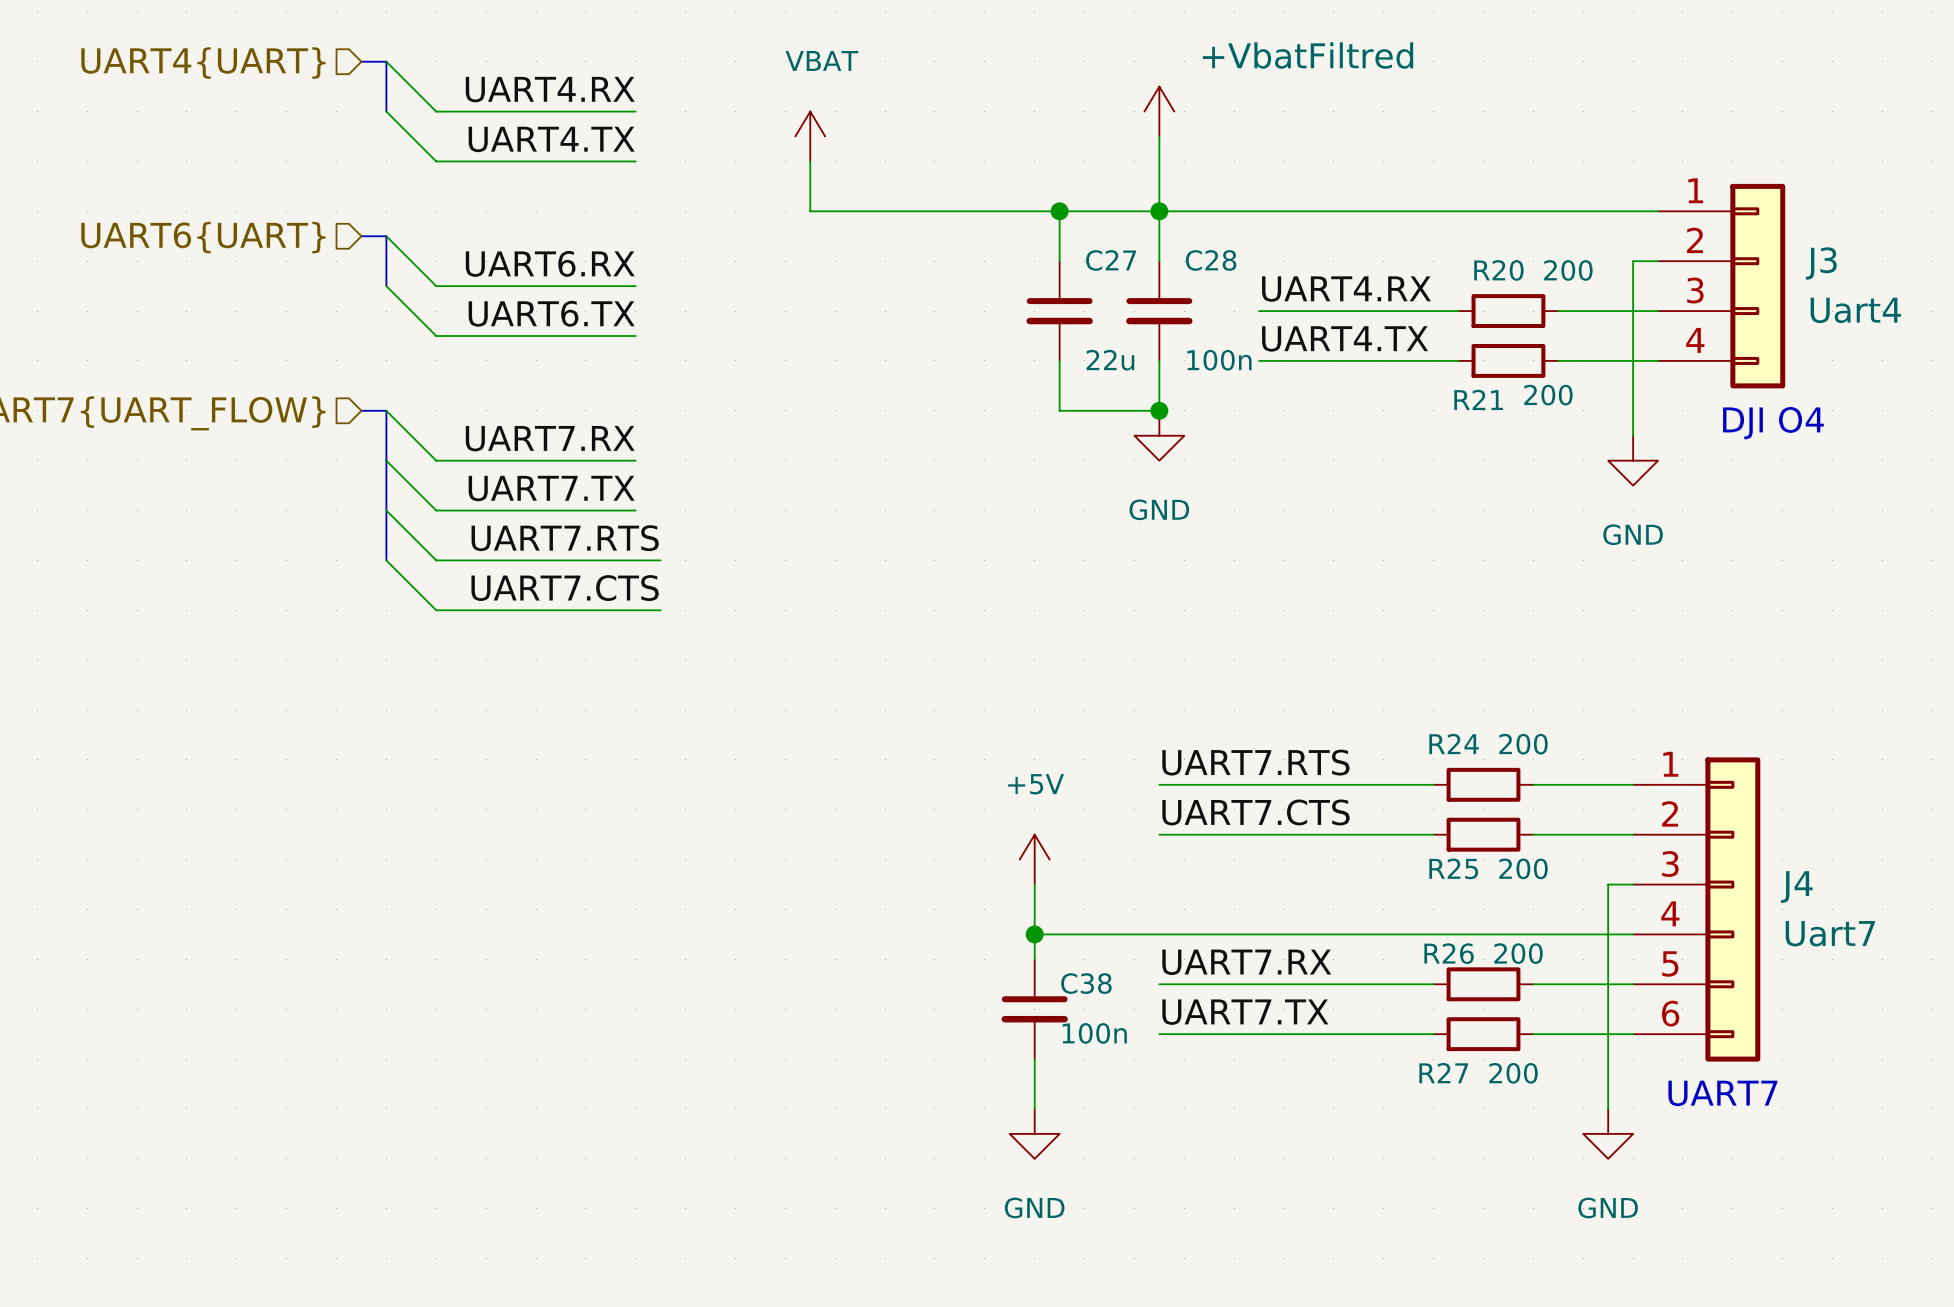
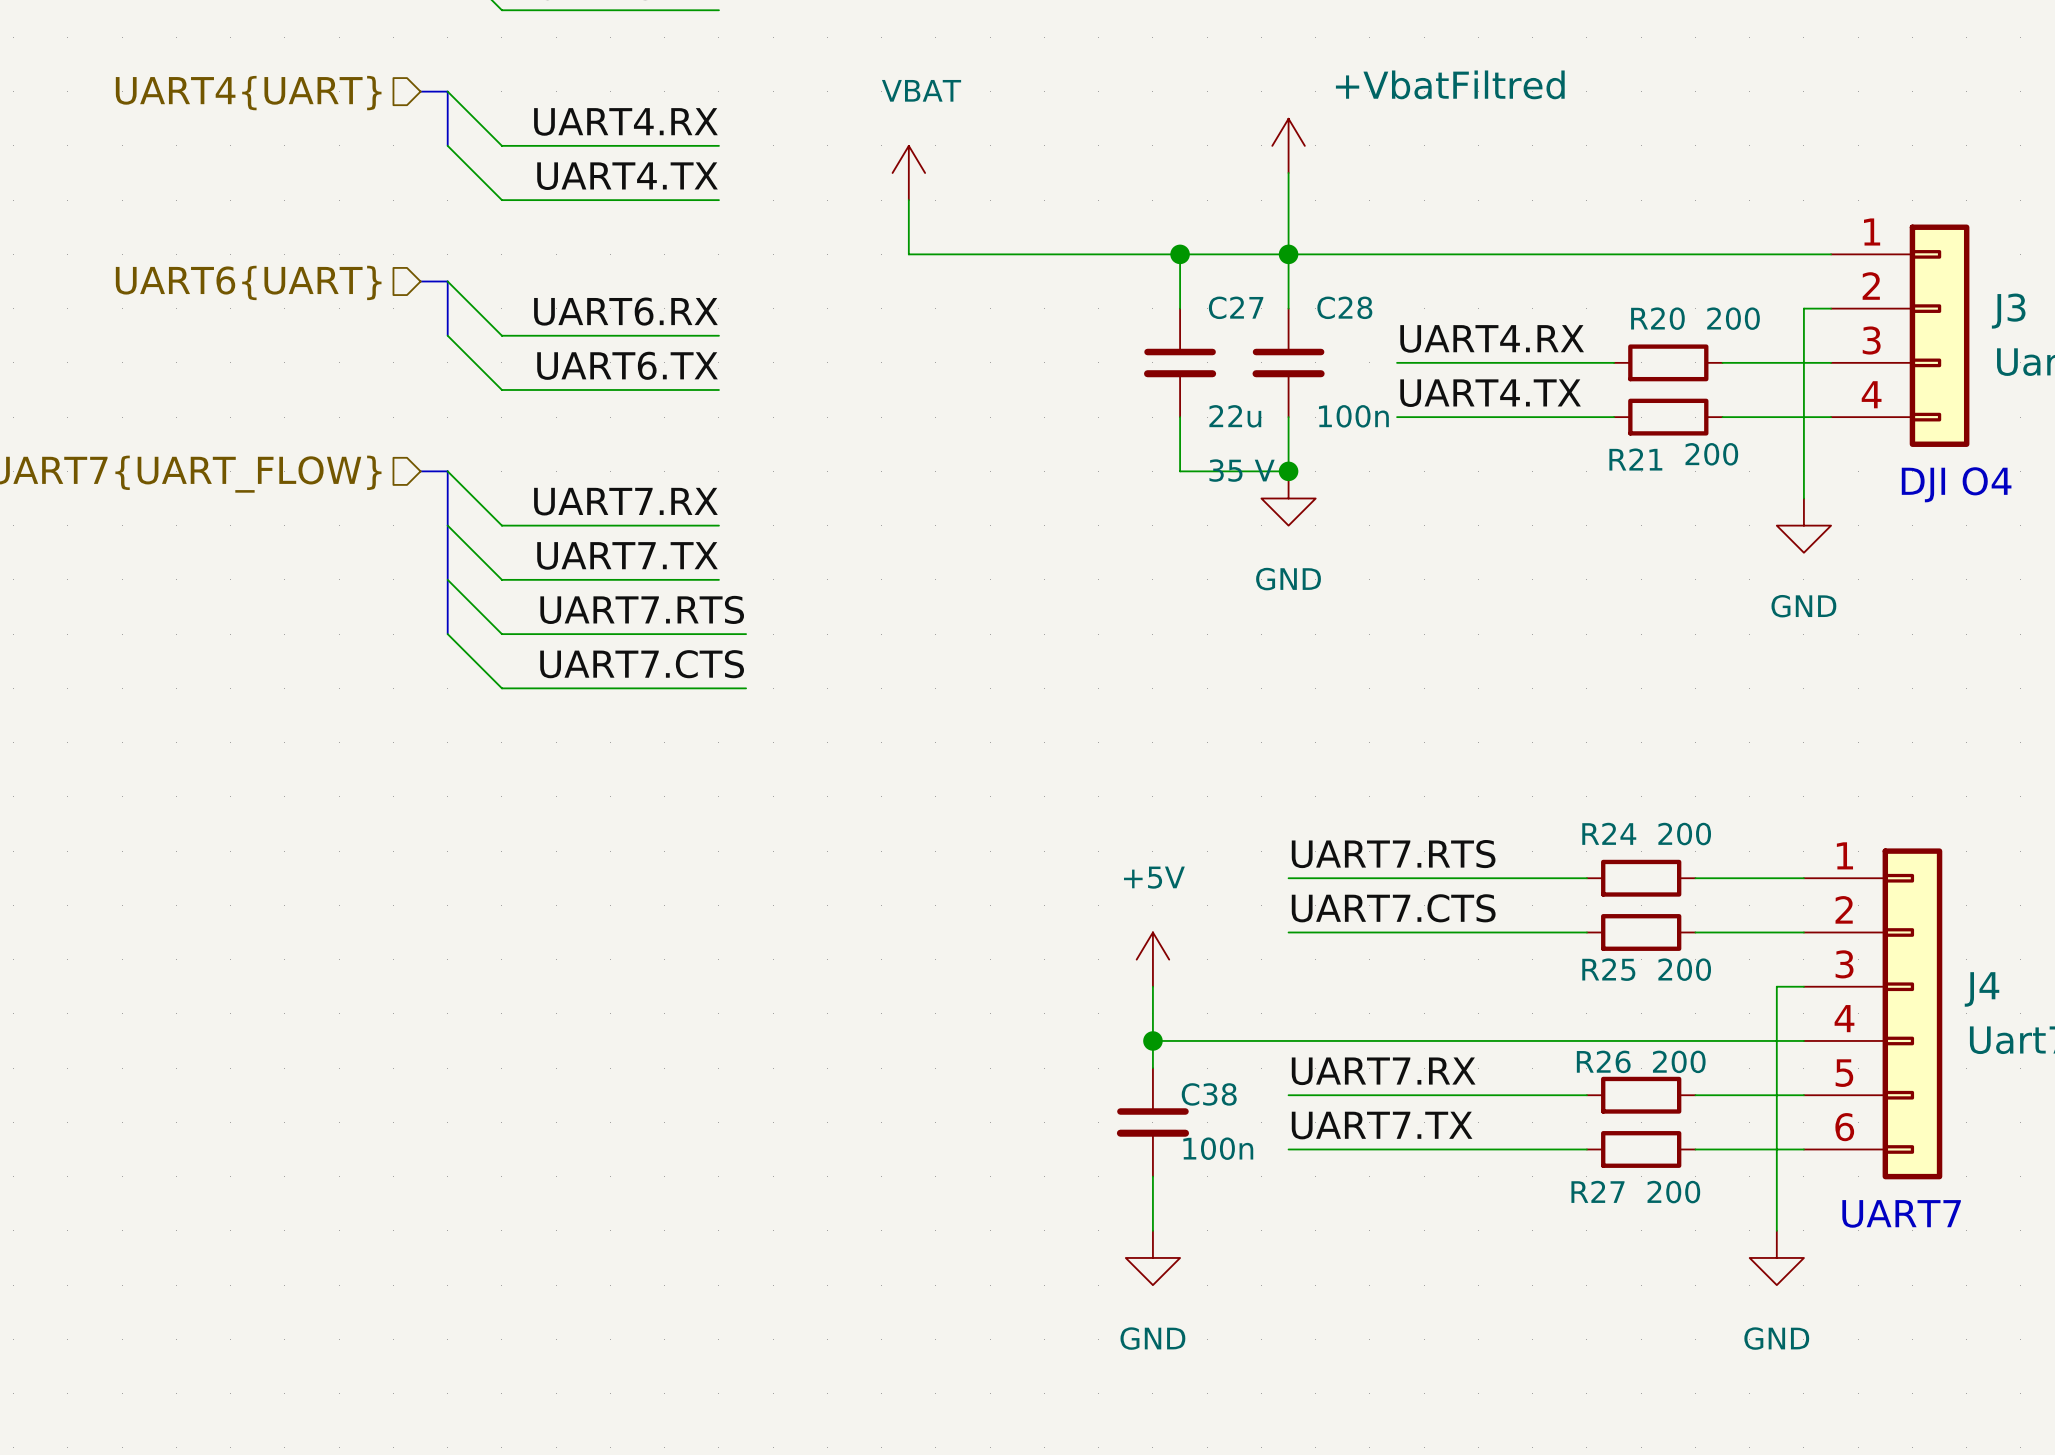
C27 text: none -> 35 V (1242, 470)

